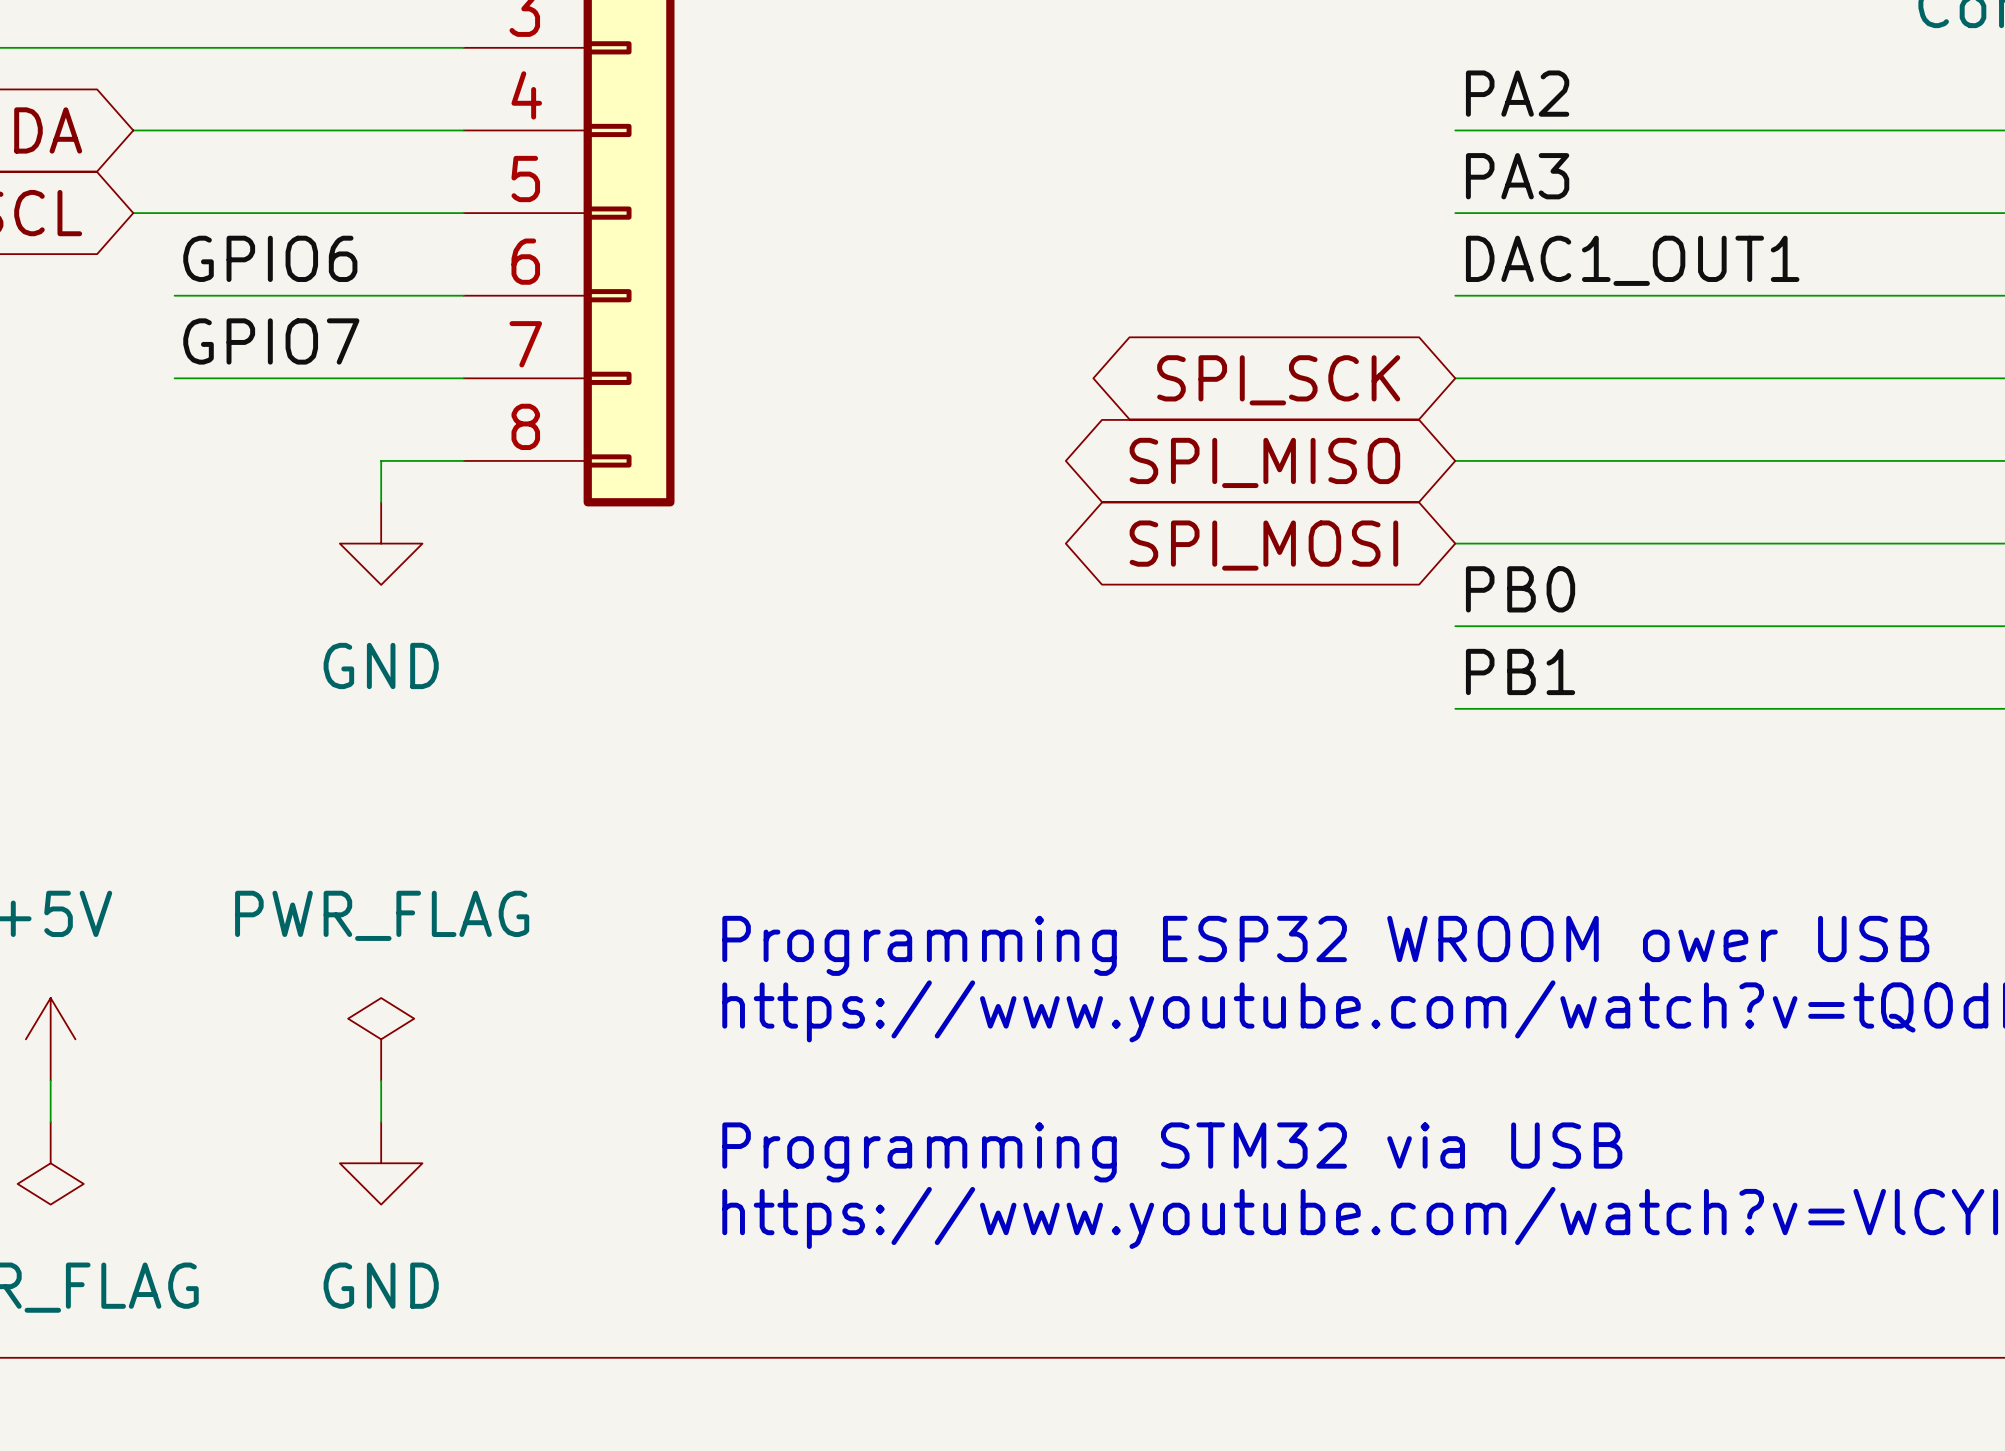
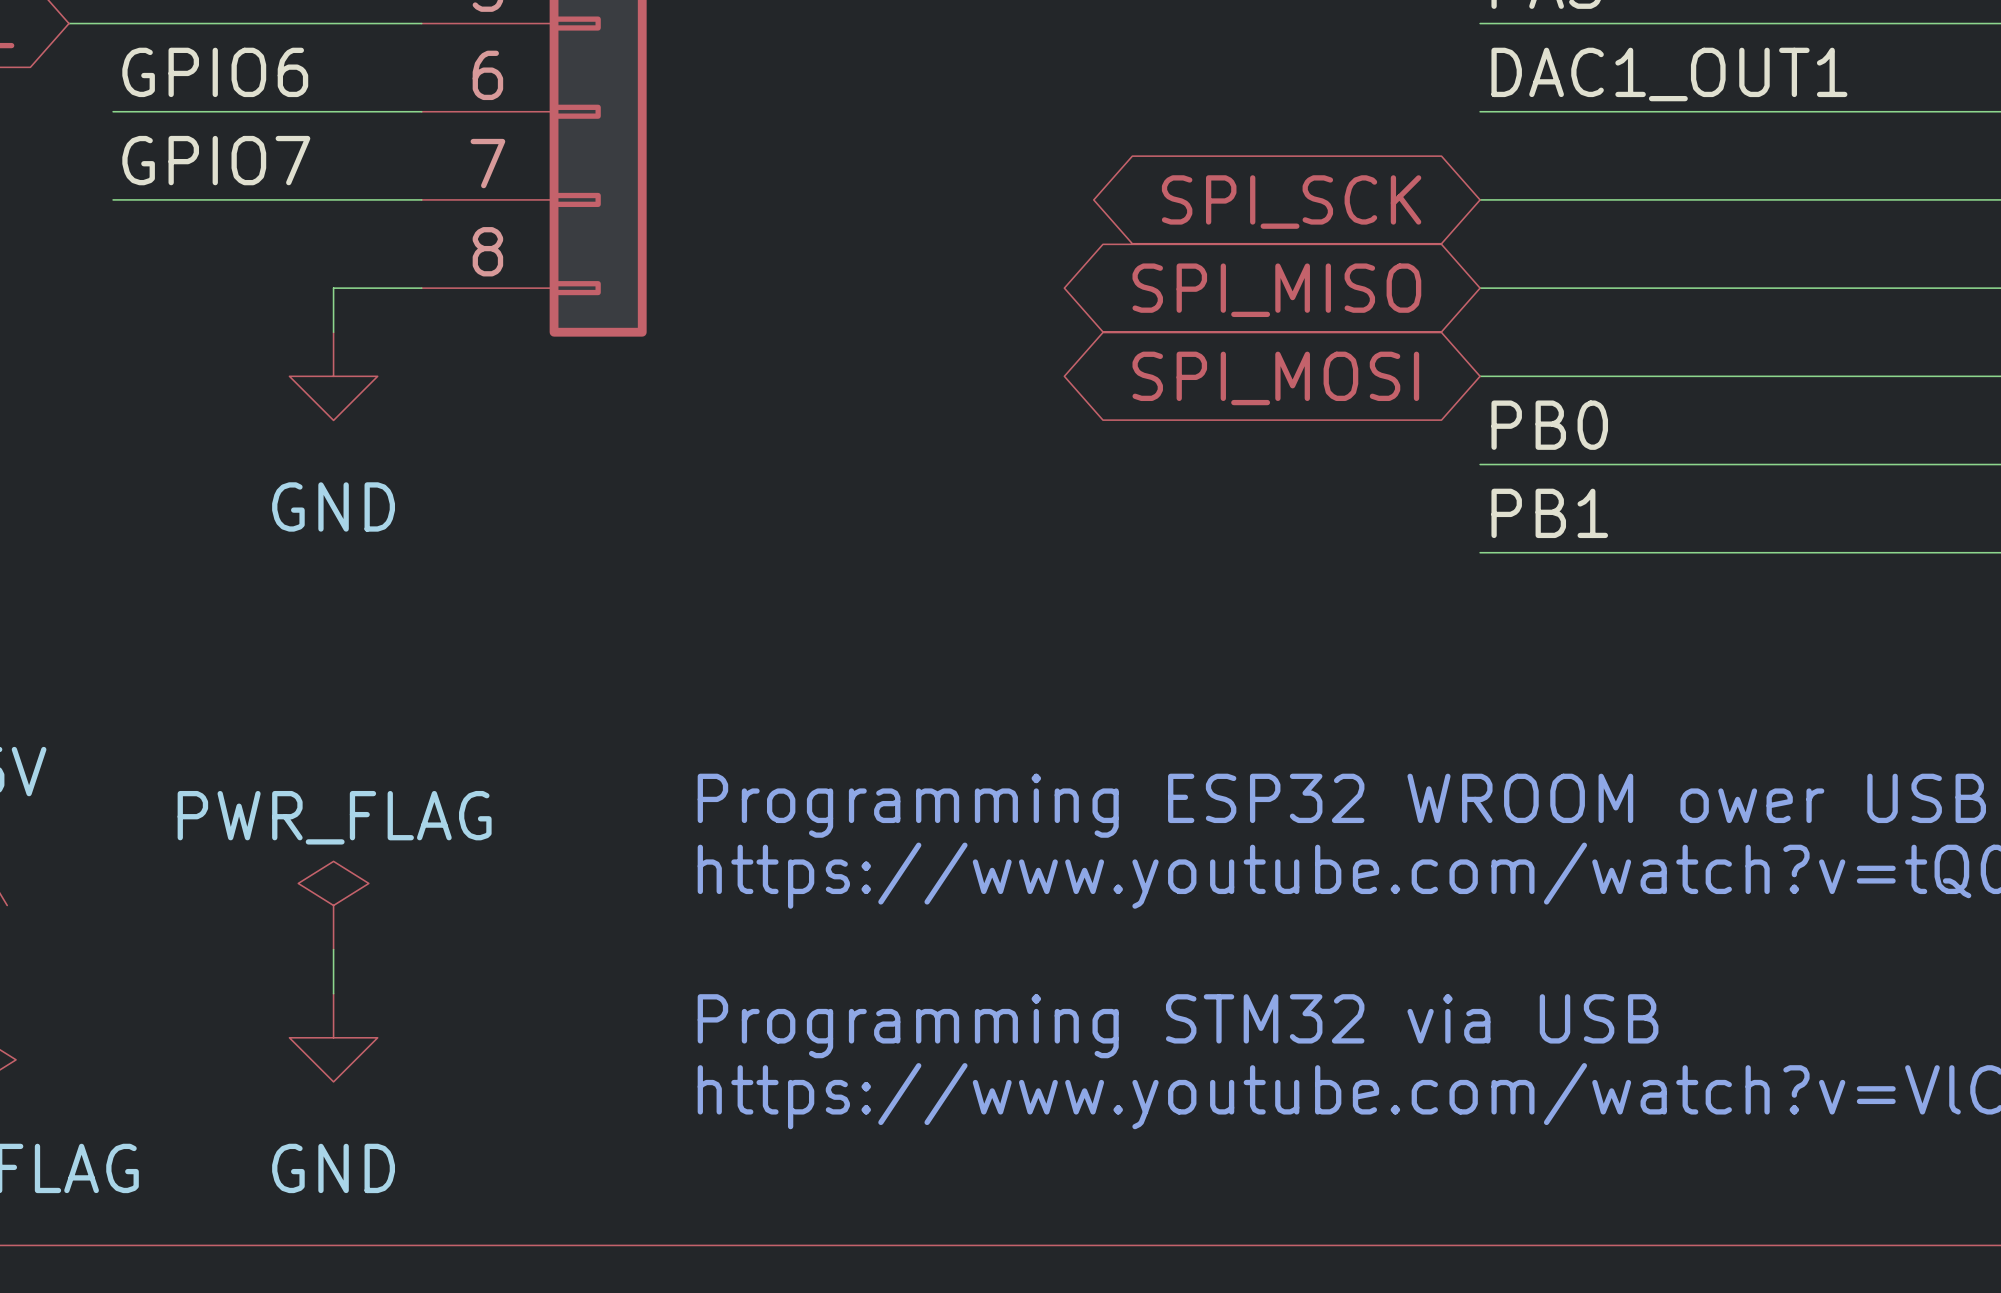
power symbol text position: PWR_FLAG (382, 915) -> PWR_FLAG (334, 817)

